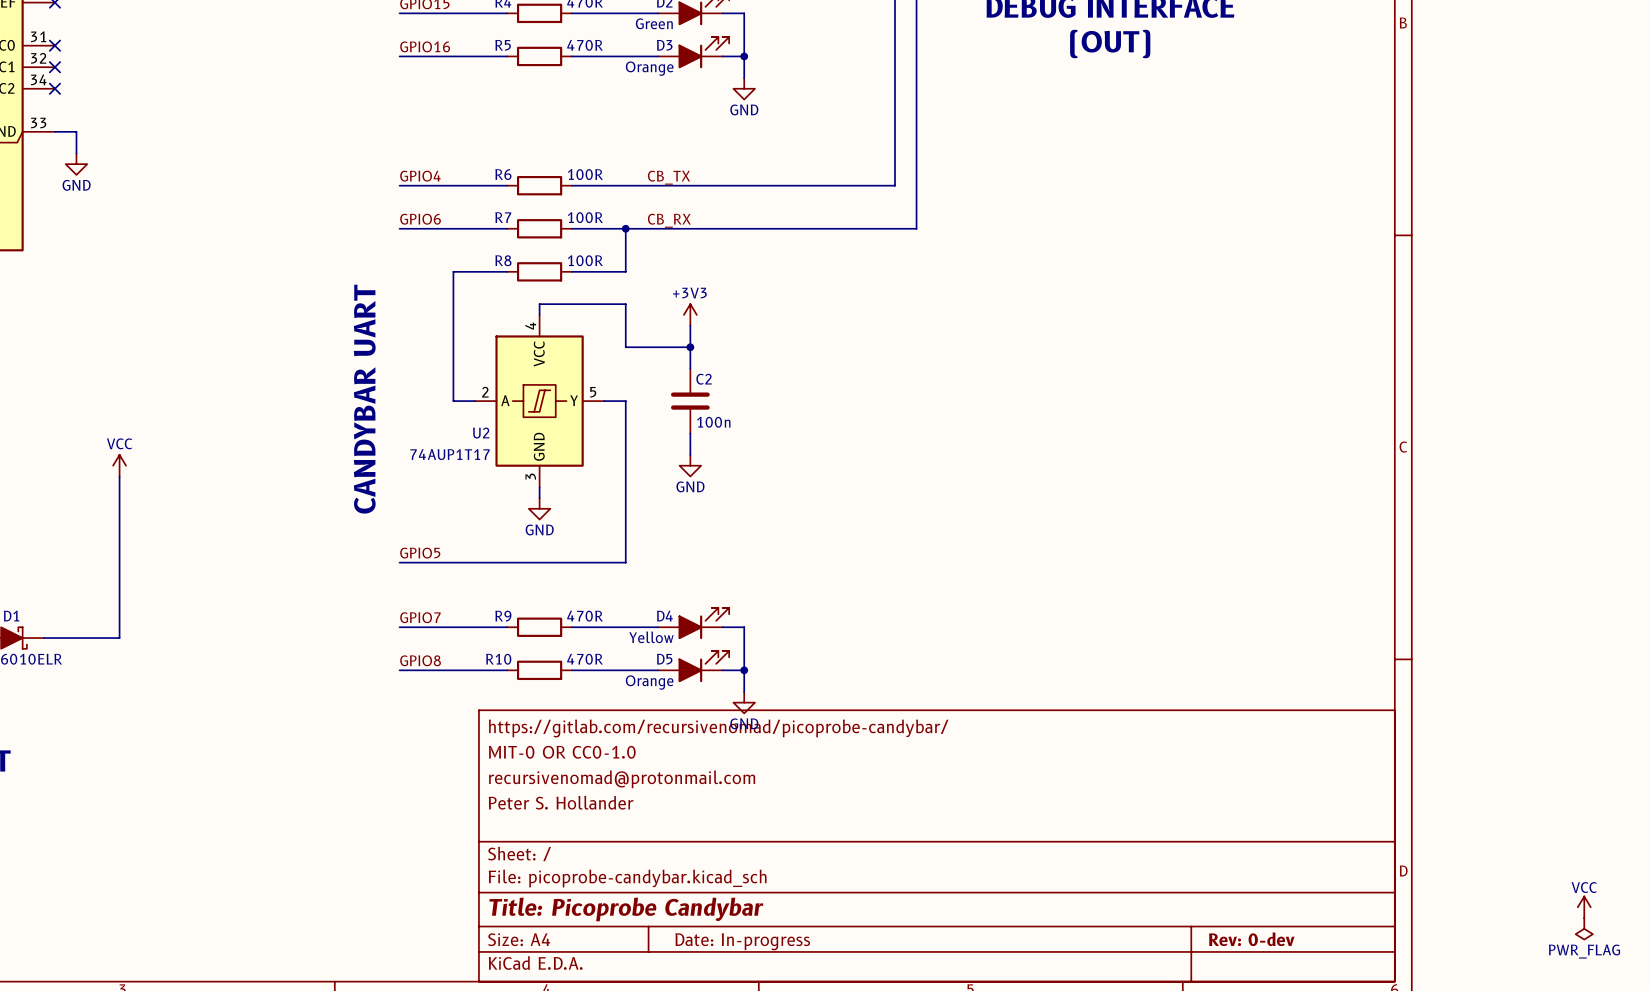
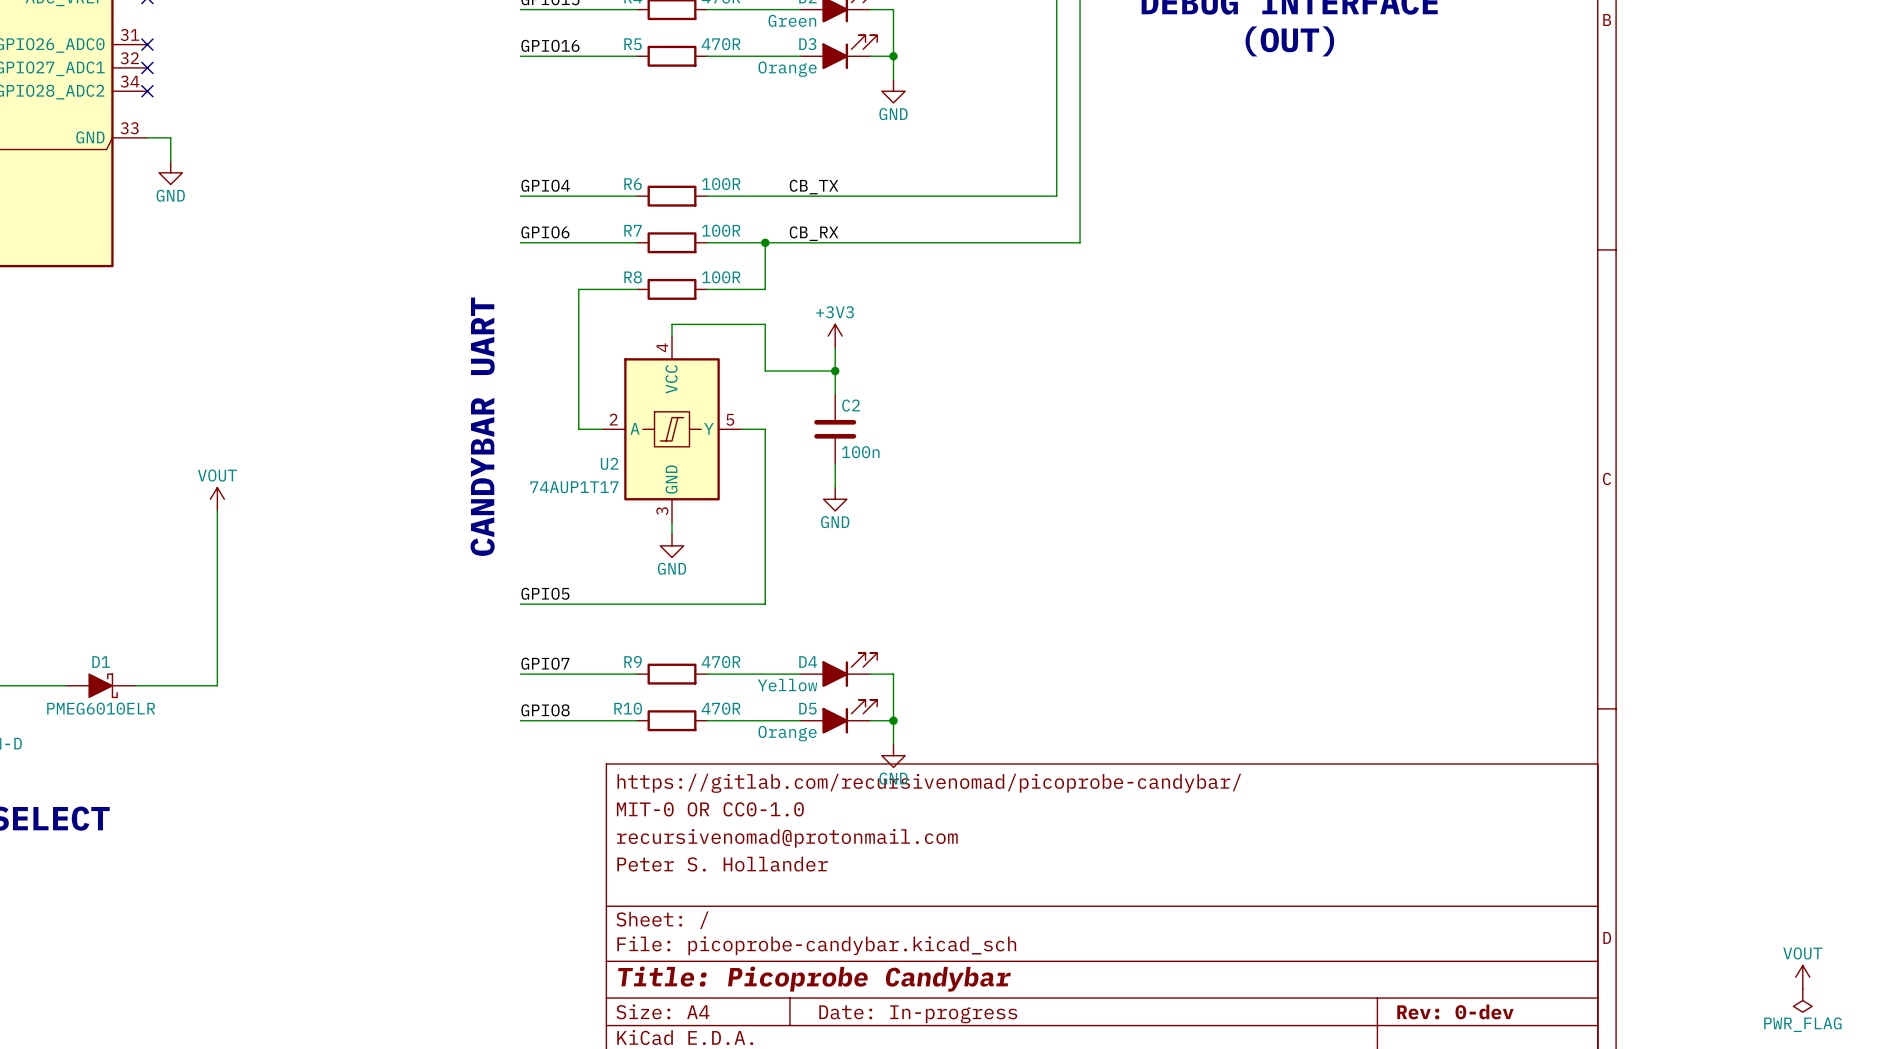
power symbol: VCC (119, 465) -> VOUT (217, 499)
power symbol: VCC (1584, 907) -> VOUT (1802, 977)

